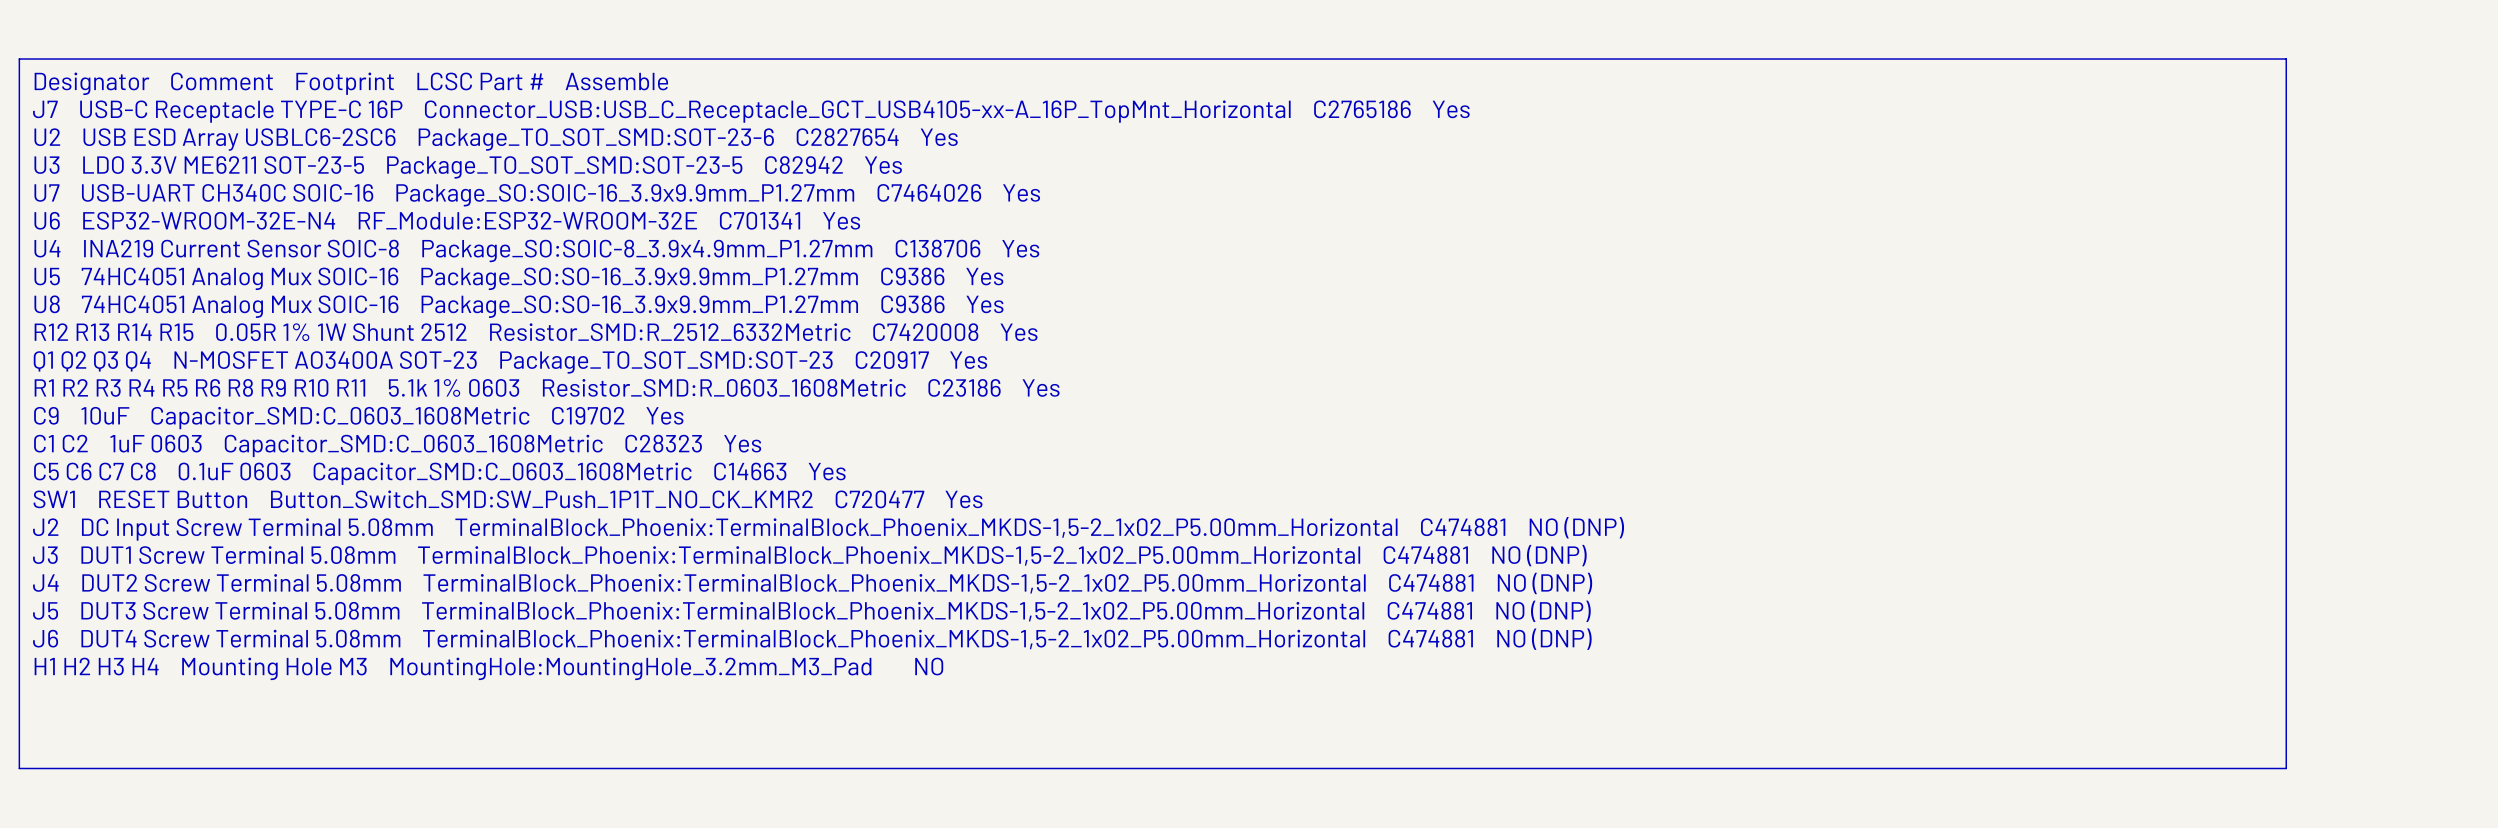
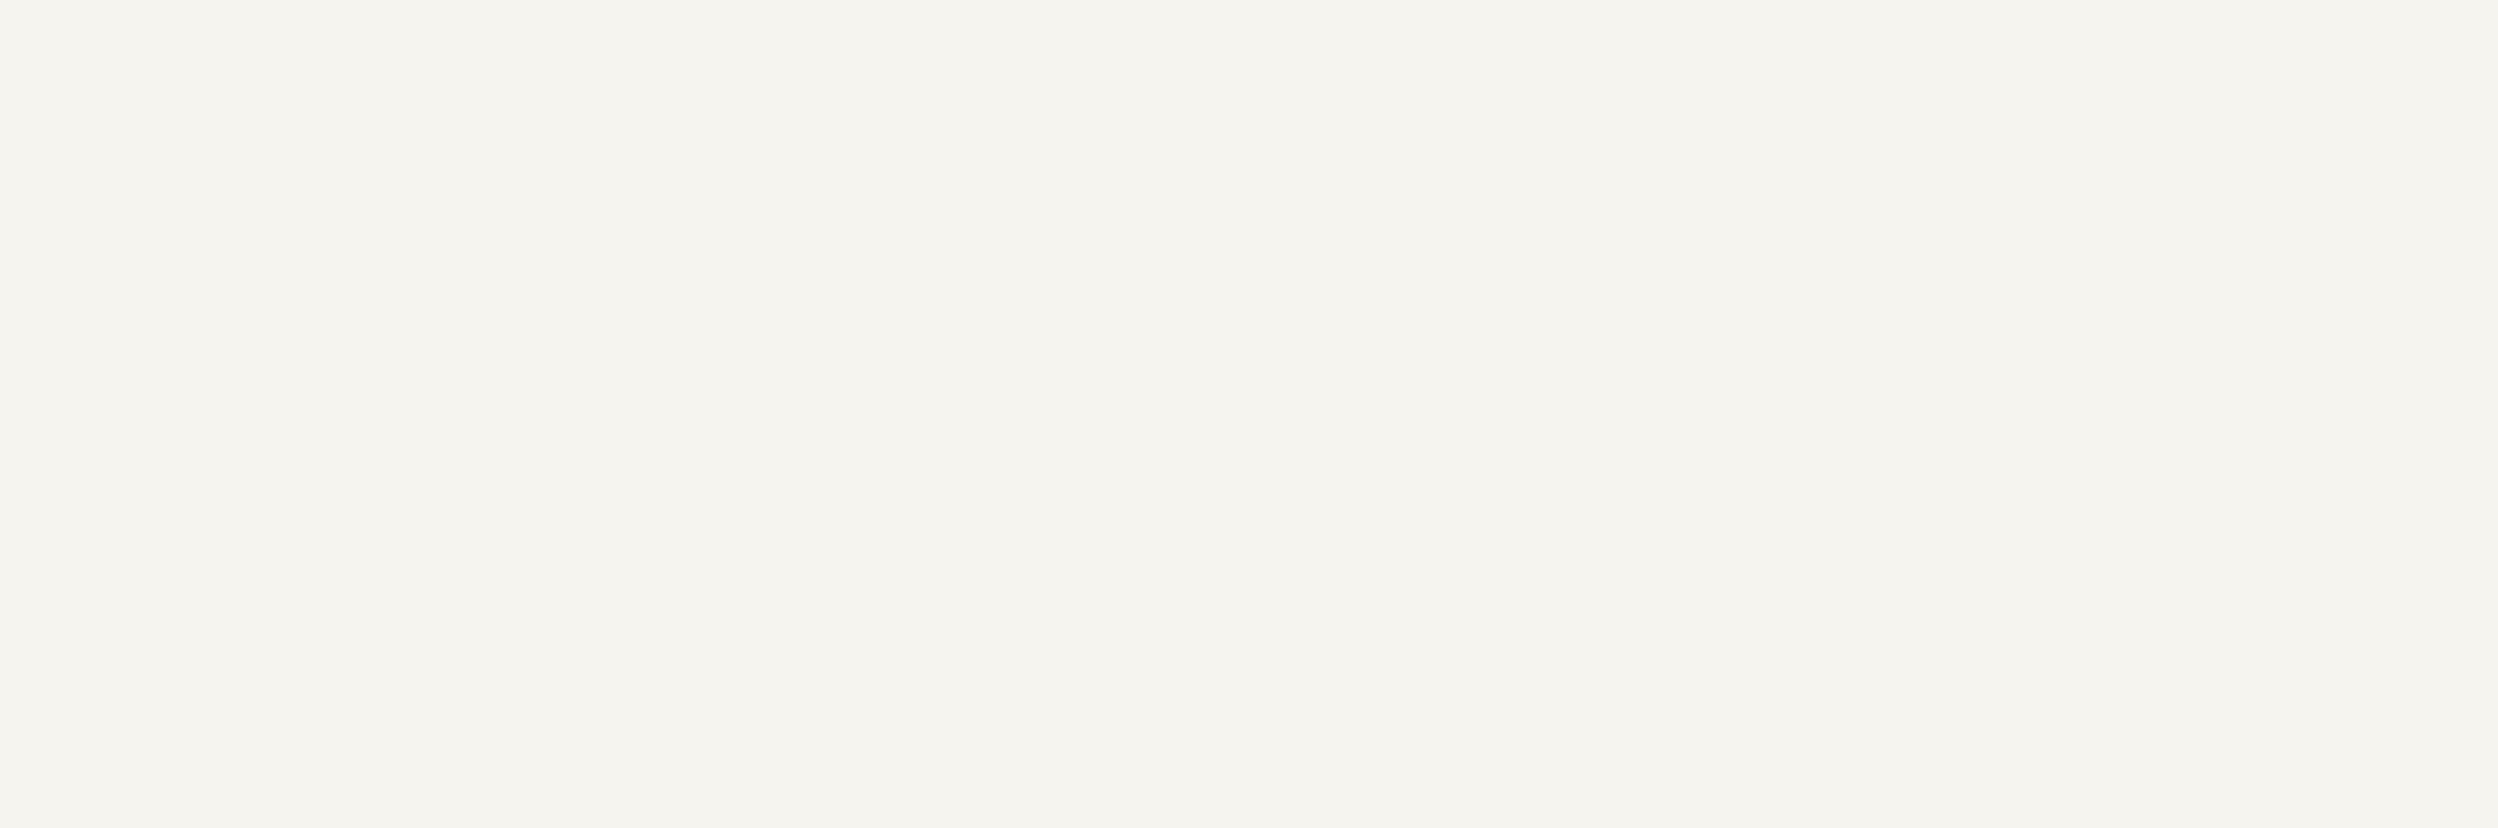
line: (19, 59) (2286, 59) (2286, 768) (19, 768) (19, 59) -> none
text: Designator Comment Footprint LCSC Part # Assemble (351, 83) -> none
text: J7 USB-C Receptacle TYPE-C 16P Connector_USB:USB_C_Receptacle_GCT_USB4105-xx-A_16P_TopMnt_Horizontal C2765186 Yes (751, 111) -> none
text: U2 USB ESD Array USBLC6-2SC6 Package_TO_SOT_SMD:SOT-23-6 C2827654 Yes (496, 139) -> none
text: U3 LDO 3.3V ME6211 SOT-23-5 Package_TO_SOT_SMD:SOT-23-5 C82942 Yes (468, 167) -> none
text: U7 USB-UART CH340C SOIC-16 Package_SO:SOIC-16_3.9x9.9mm_P1.27mm C7464026 Yes (537, 195) -> none
text: U6 ESP32-WROOM-32E-N4 RF_Module:ESP32-WROOM-32E C701341 Yes (447, 220) -> none
text: U4 INA219 Current Sensor SOIC-8 Package_SO:SOIC-8_3.9x4.9mm_P1.27mm C138706 Yes (536, 250) -> none
text: U5 74HC4051 Analog Mux SOIC-16 Package_SO:SO-16_3.9x9.9mm_P1.27mm C9386 Yes (518, 278) -> none
text: U8 74HC4051 Analog Mux SOIC-16 Package_SO:SO-16_3.9x9.9mm_P1.27mm C9386 Yes (518, 306) -> none
text: R12 R13 R14 R15 0.05R 1% 1W Shunt 2512 Resistor_SMD:R_2512_6332Metric C7420008 Yes (536, 332) -> none
text: Q1 Q2 Q3 Q4 N-MOSFET AO3400A SOT-23 Package_TO_SOT_SMD:SOT-23 C20917 Yes (510, 362) -> none
text: R1 R2 R3 R4 R5 R6 R8 R9 R10 R11 5.1k 1% 0603 Resistor_SMD:R_0603_1608Metric C23186 Yes (547, 387) -> none
text: C9 10uF Capacitor_SMD:C_0603_1608Metric C19702 Yes (358, 418) -> none
text: C1 C2 1uF 0603 Capacitor_SMD:C_0603_1608Metric C28323 Yes (397, 445) -> none
text: C5 C6 C7 C8 0.1uF 0603 Capacitor_SMD:C_0603_1608Metric C14663 Yes (439, 473) -> none
text: SW1 RESET Button Button_Switch_SMD:SW_Push_1P1T_NO_CK_KMR2 C720477 Yes (508, 499) -> none
text: J2 DC Input Screw Terminal 5.08mm TerminalBlock_Phoenix:TerminalBlock_Phoenix_MKDS-1,5-2_1x02_P5.00mm_Horizontal C474881 NO (DNP) (828, 528) -> none
text: J3 DUT1 Screw Terminal 5.08mm TerminalBlock_Phoenix:TerminalBlock_Phoenix_MKDS-1,5-2_1x02_P5.00mm_Horizontal C474881 NO (DNP) (809, 555) -> none
text: J4 DUT2 Screw Terminal 5.08mm TerminalBlock_Phoenix:TerminalBlock_Phoenix_MKDS-1,5-2_1x02_P5.00mm_Horizontal C474881 NO (DNP) (812, 583) -> none
text: J5 DUT3 Screw Terminal 5.08mm TerminalBlock_Phoenix:TerminalBlock_Phoenix_MKDS-1,5-2_1x02_P5.00mm_Horizontal C474881 NO (DNP) (811, 611) -> none
text: J6 DUT4 Screw Terminal 5.08mm TerminalBlock_Phoenix:TerminalBlock_Phoenix_MKDS-1,5-2_1x02_P5.00mm_Horizontal C474881 NO (DNP) (812, 639) -> none
text: H1 H2 H3 H4 Mounting Hole M3 MountingHole:MountingHole_3.2mm_M3_Pad NO (488, 668) -> none

